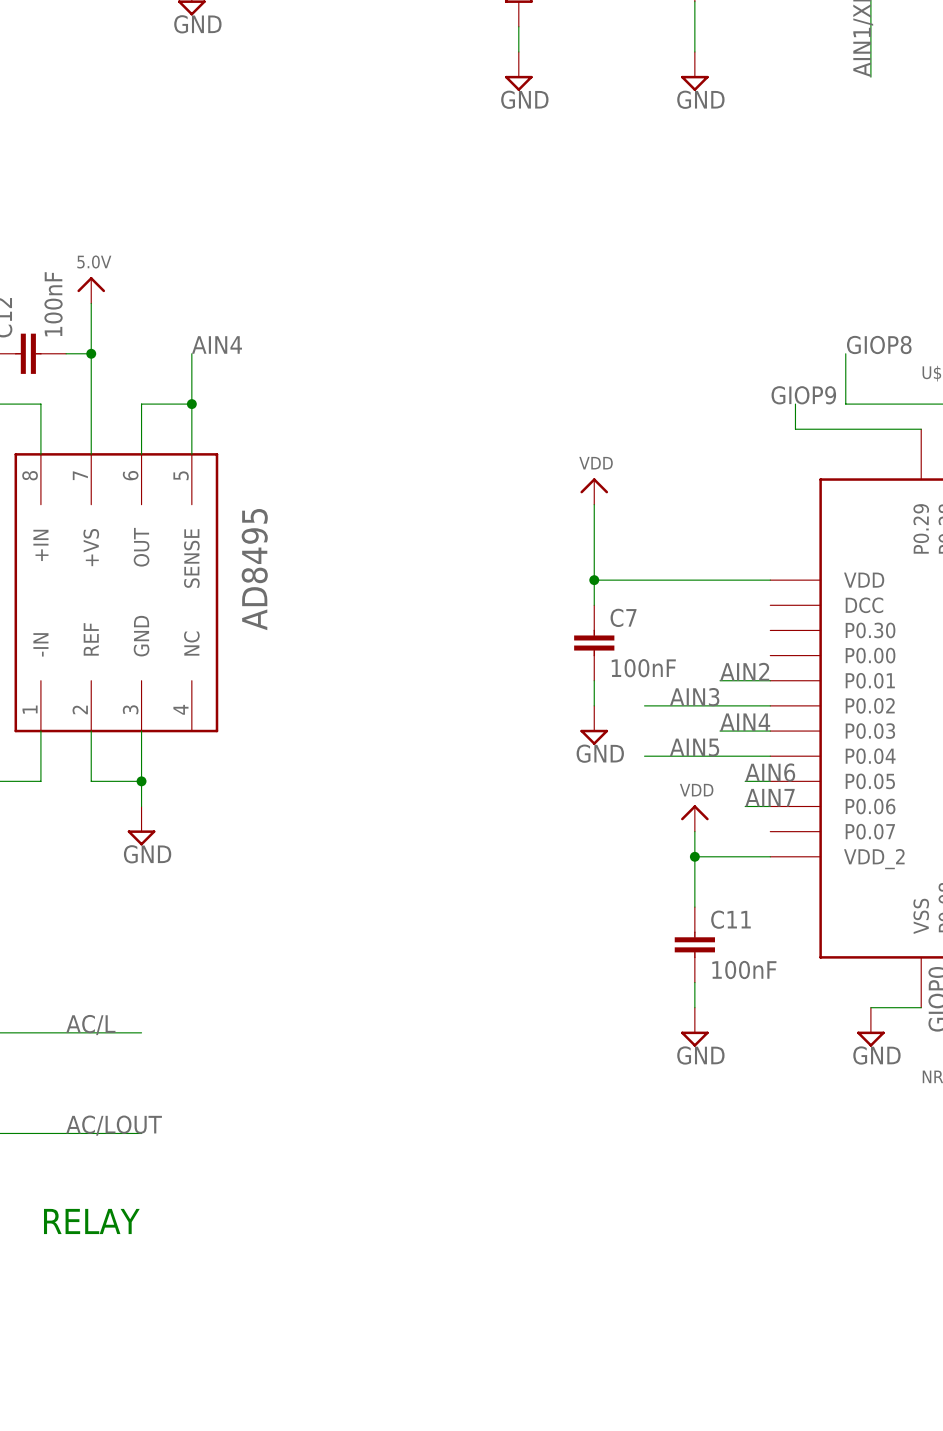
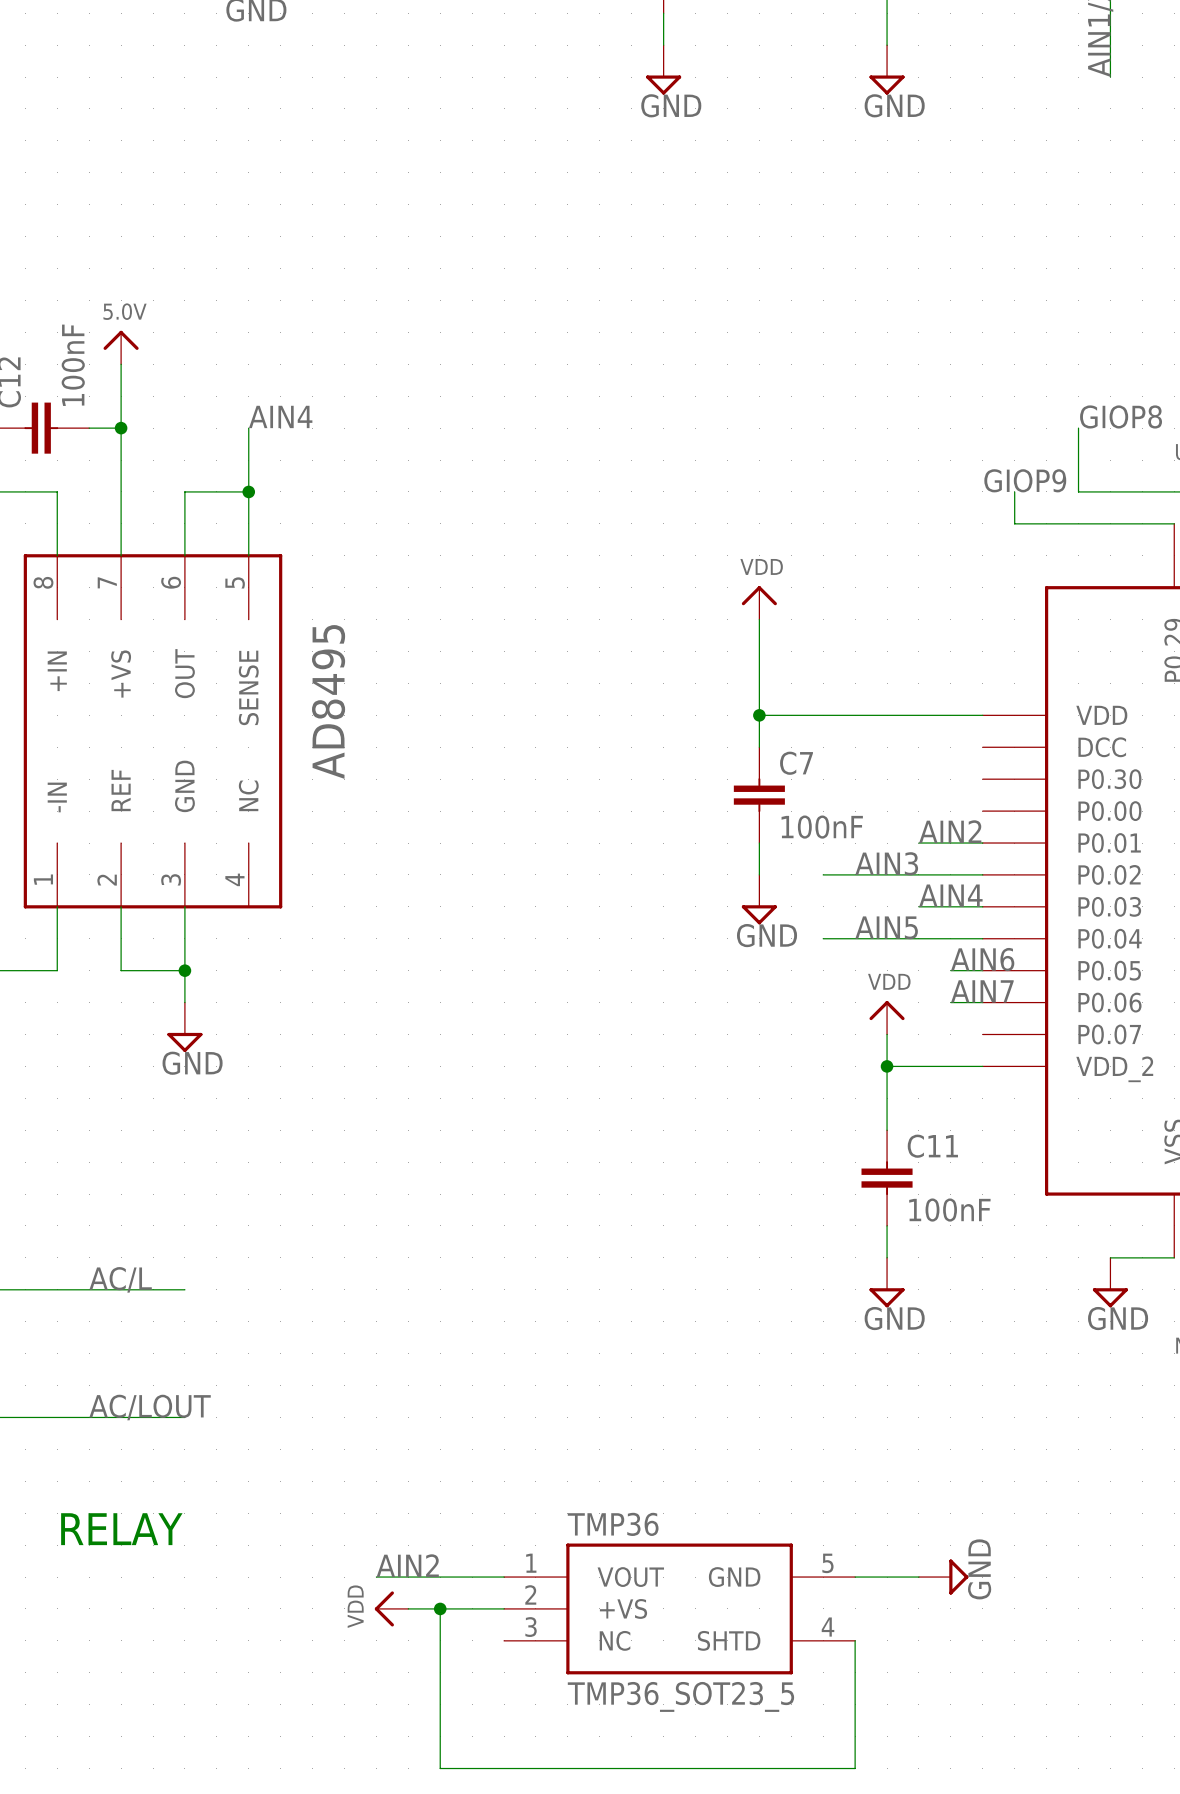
label: none -> AIN2 (407, 1565)
wire: none -> (376, 1577) (504, 1577)
wire: none -> (855, 1577) (918, 1577)
power symbol: none -> GND (943, 1577)
power symbol: none -> VDD (391, 1608)
wire: none -> (408, 1608) (504, 1608)
wire: none -> (440, 1608) (440, 1768) (855, 1768) (855, 1640)
junction: none -> (440, 1608)
TMP36: none -> TMP36_SOT23_5 (679, 1608)

